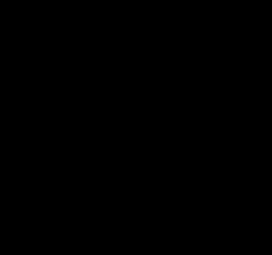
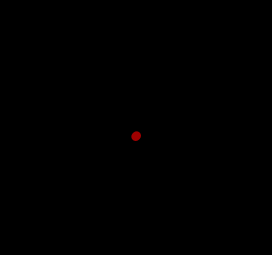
top track: none -> (136, 135) (135, 136)

